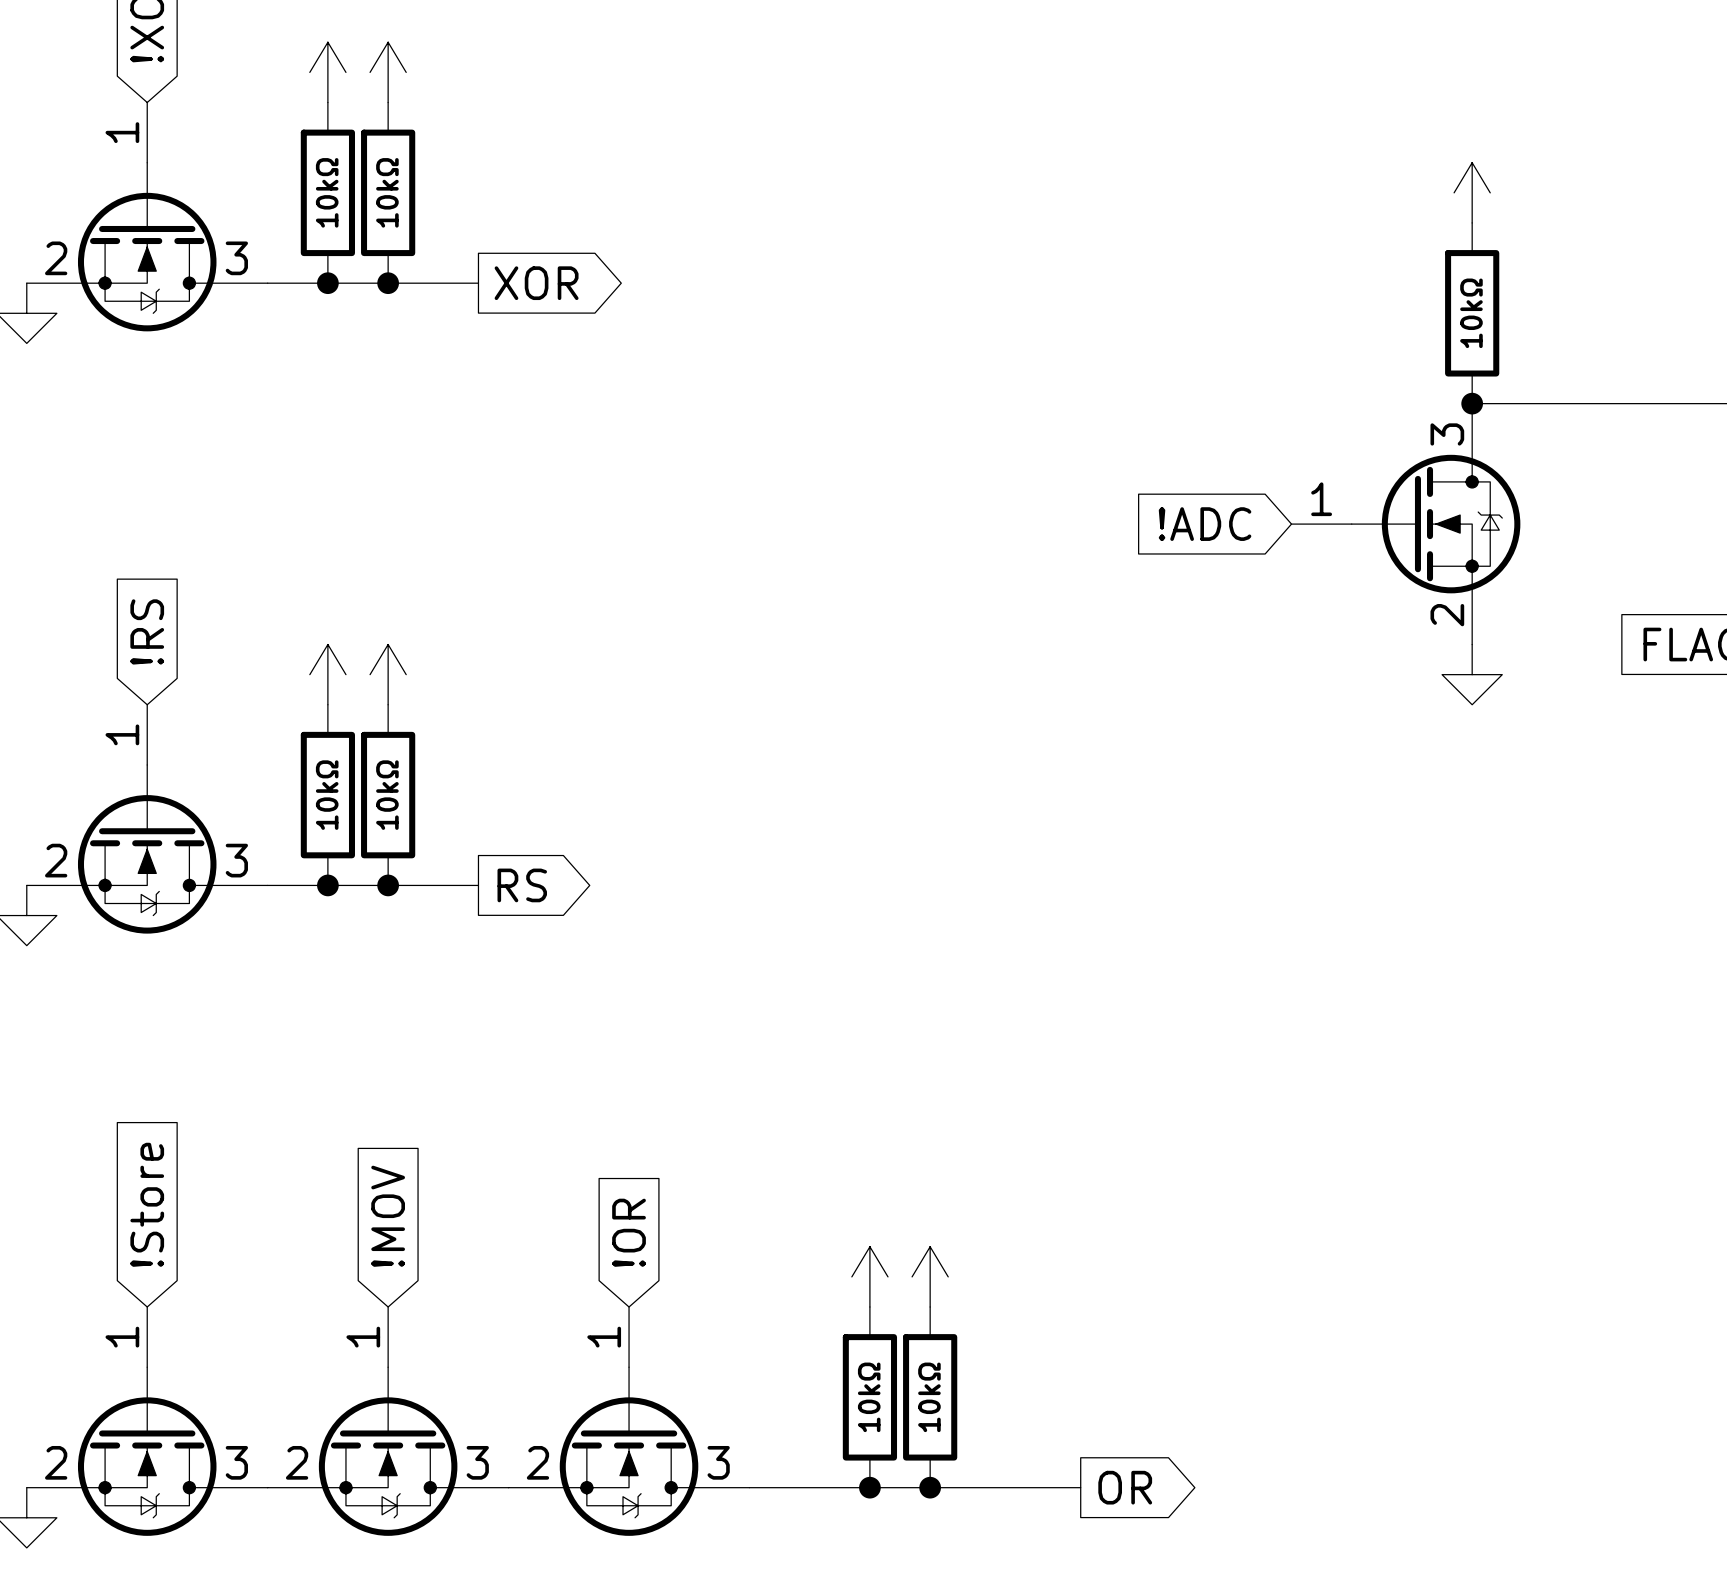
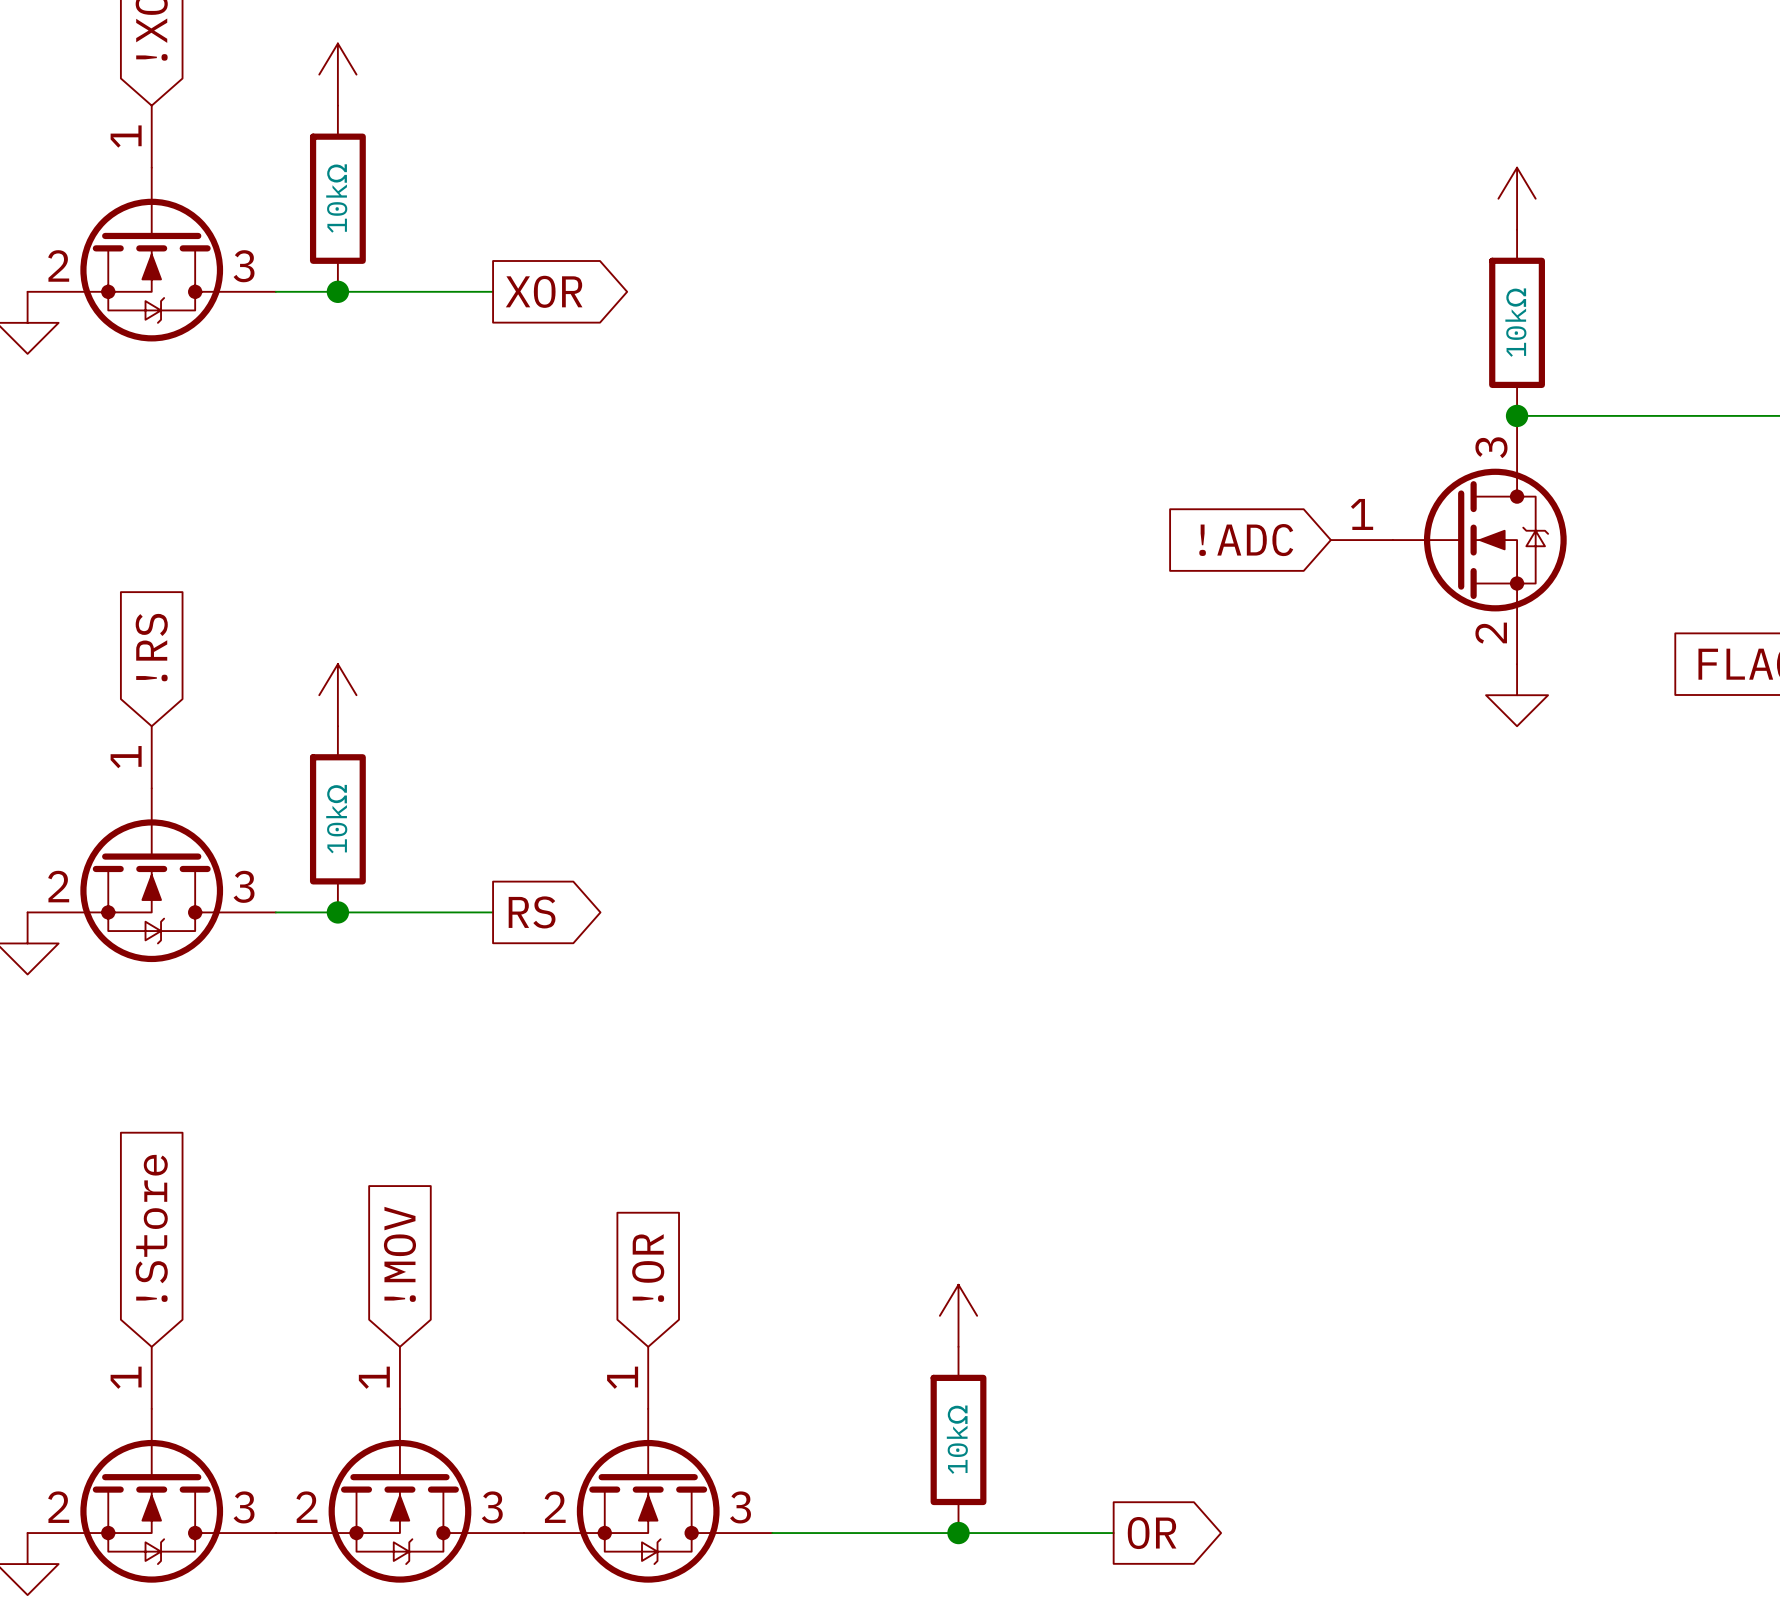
power symbol: (388, 72) -> none
part: 10kΩ (388, 192) -> none
junction: (388, 283) -> none
power symbol: (388, 674) -> none
part: 10kΩ (388, 795) -> none
junction: (388, 885) -> none
power symbol: (869, 1276) -> none
part: 10kΩ (869, 1397) -> none
junction: (869, 1487) -> none

